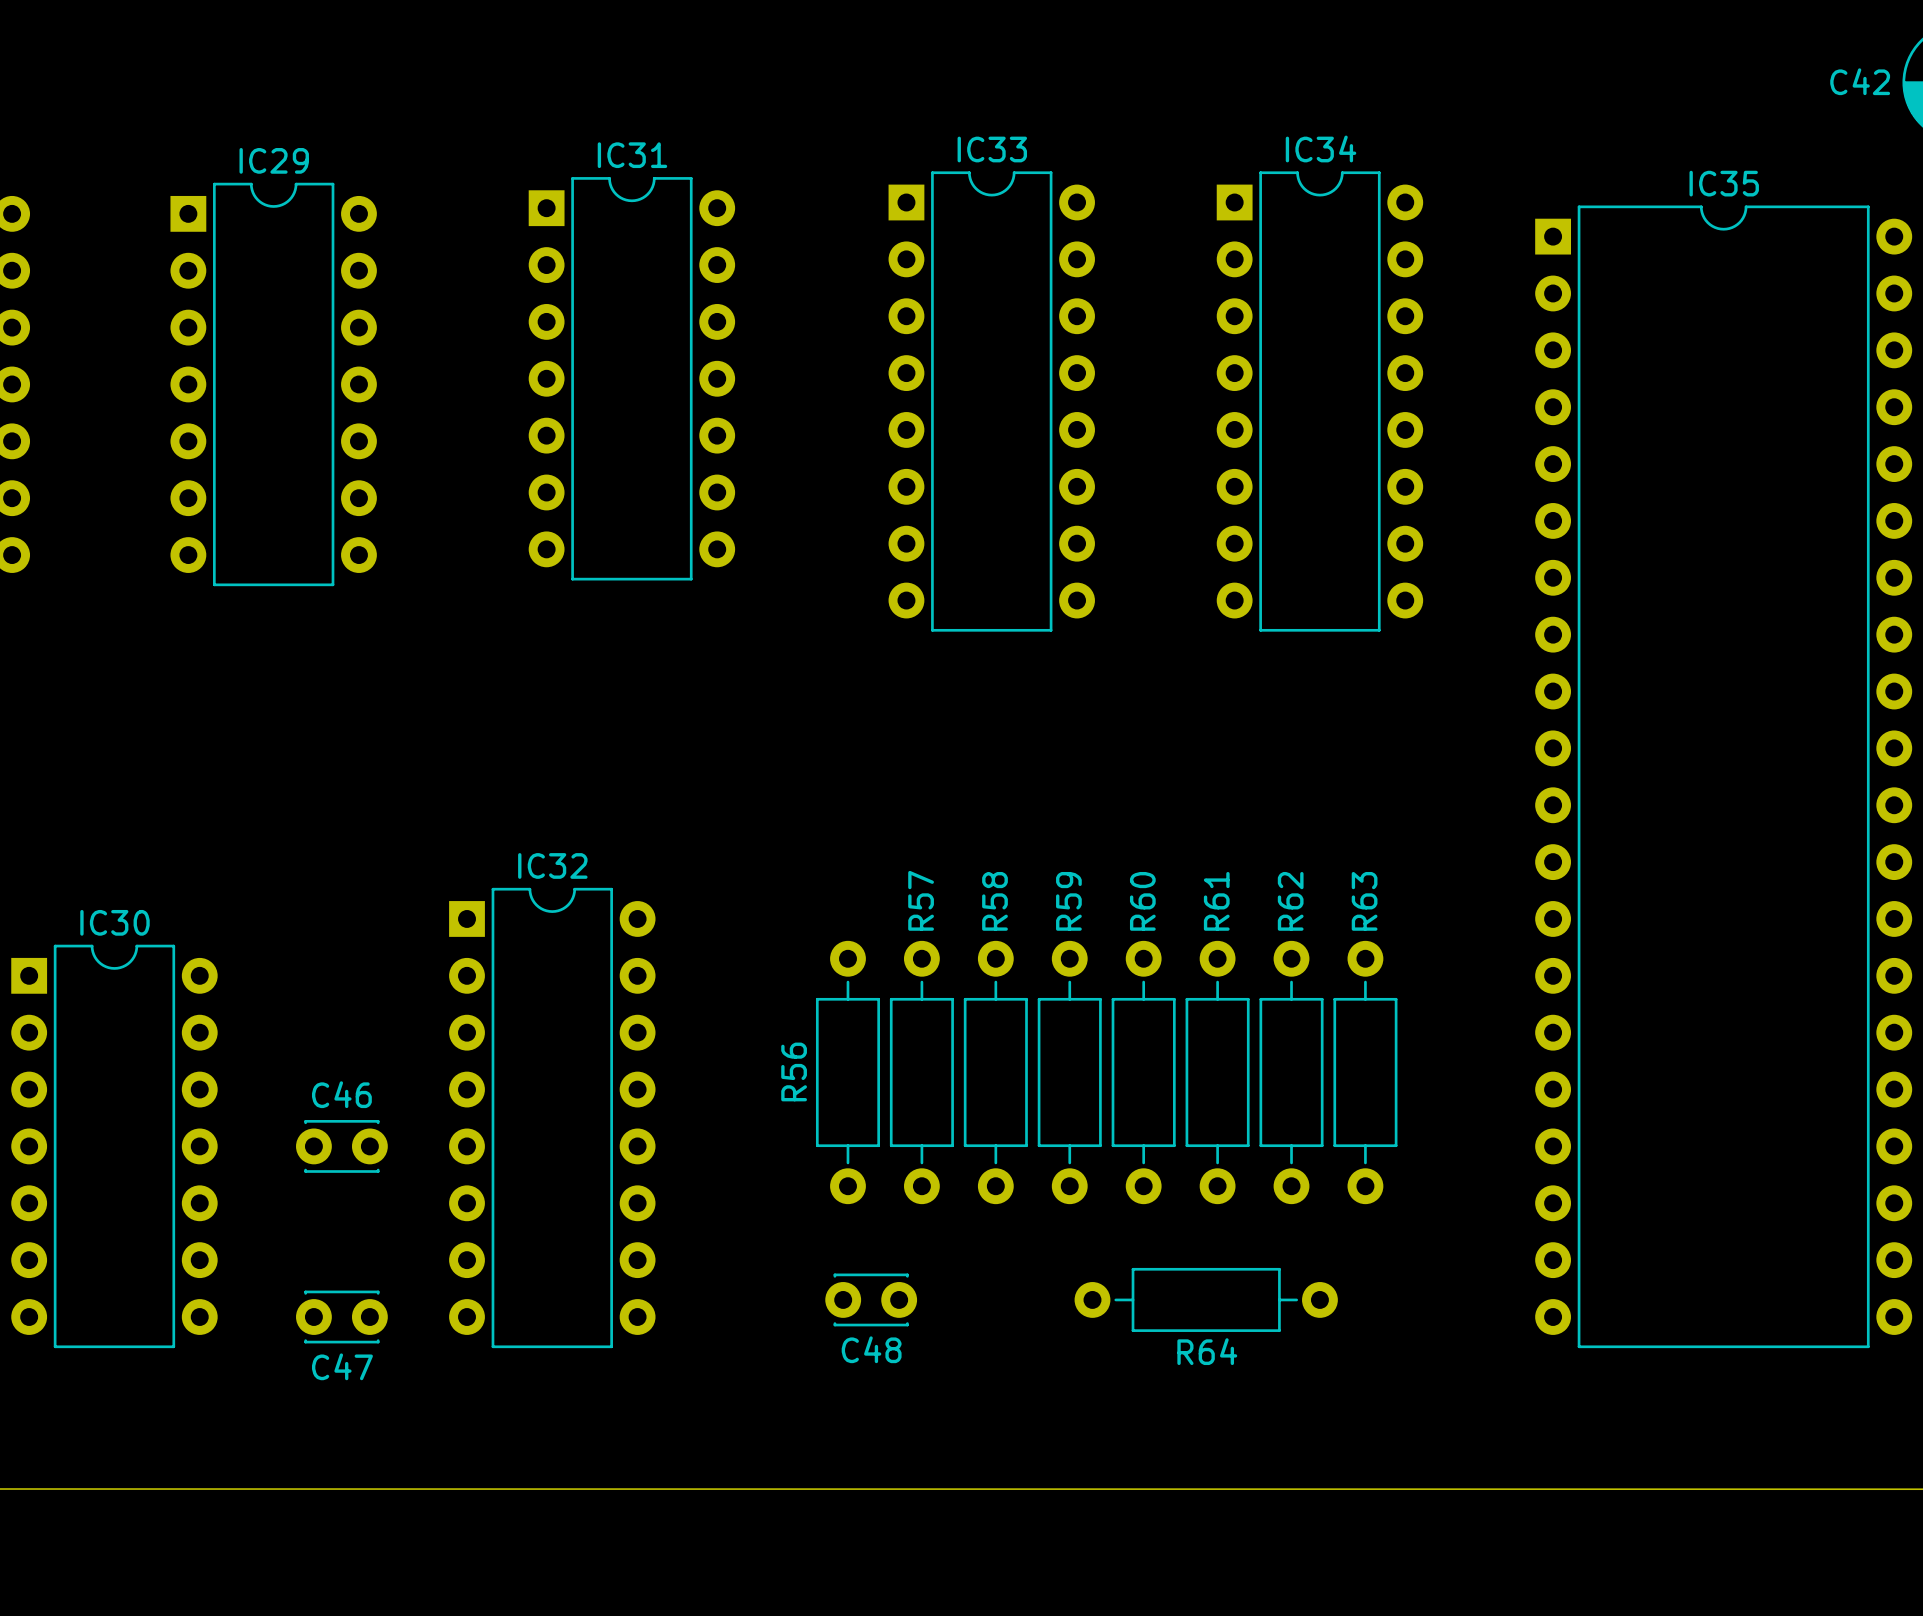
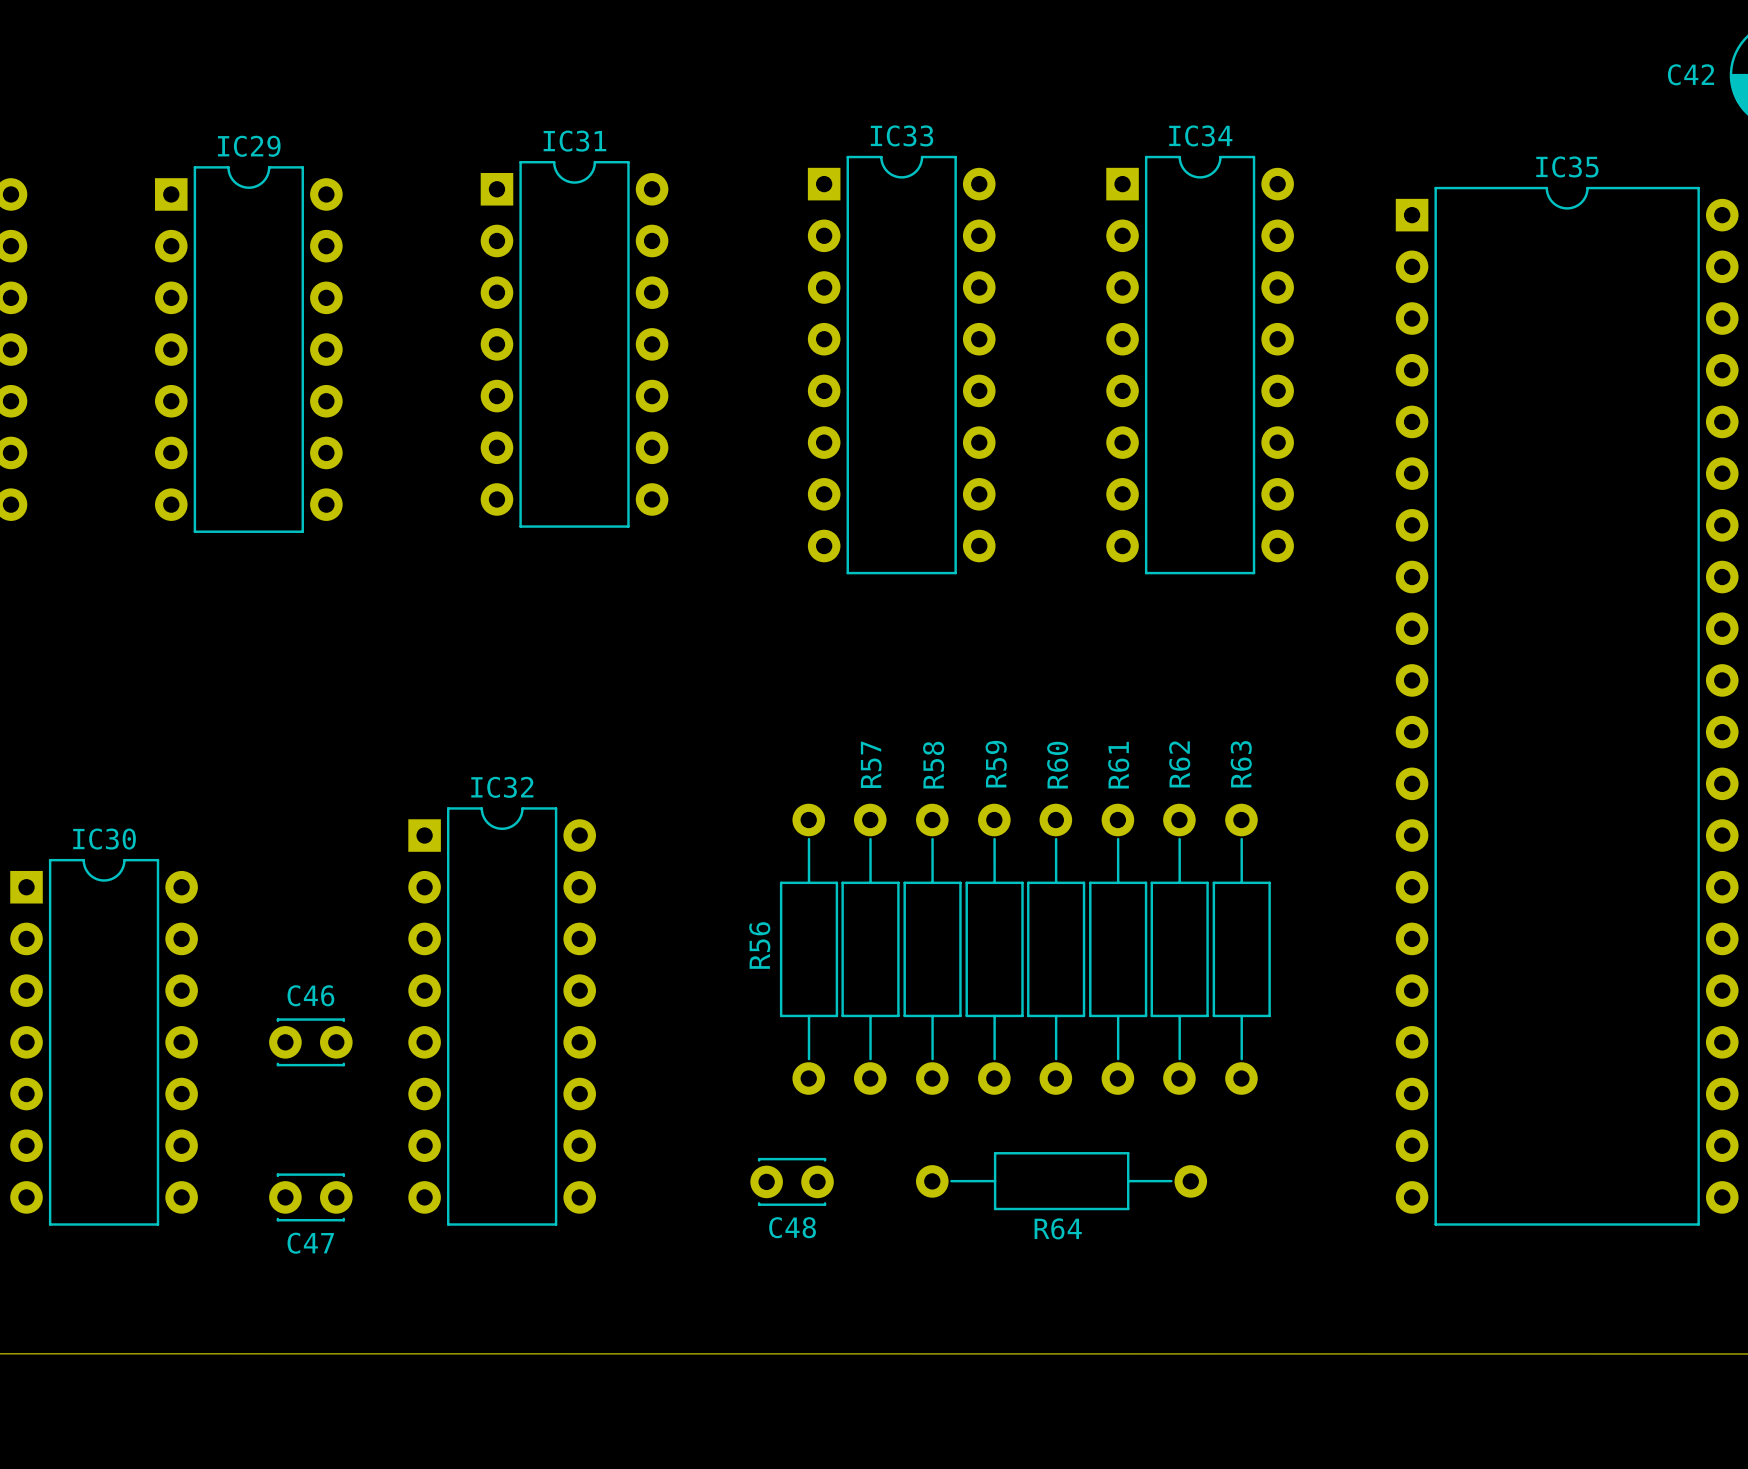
R56 footprint: [815, 940, 881, 1205] -> [779, 803, 839, 1095]
R57 footprint: [889, 940, 954, 1205] -> [841, 803, 900, 1095]
R58 footprint: [963, 940, 1028, 1205] -> [903, 803, 962, 1095]
R59 footprint: [1037, 940, 1102, 1205] -> [965, 803, 1024, 1095]
R60 footprint: [1111, 940, 1176, 1205] -> [1027, 803, 1086, 1095]
R61 footprint: [1185, 940, 1250, 1205] -> [1089, 803, 1148, 1095]
R62 footprint: [1259, 940, 1324, 1205] -> [1150, 803, 1209, 1095]
R63 footprint: [1333, 940, 1398, 1205] -> [1212, 803, 1271, 1095]
R64 footprint: [1074, 1267, 1338, 1332] -> [916, 1152, 1208, 1211]

